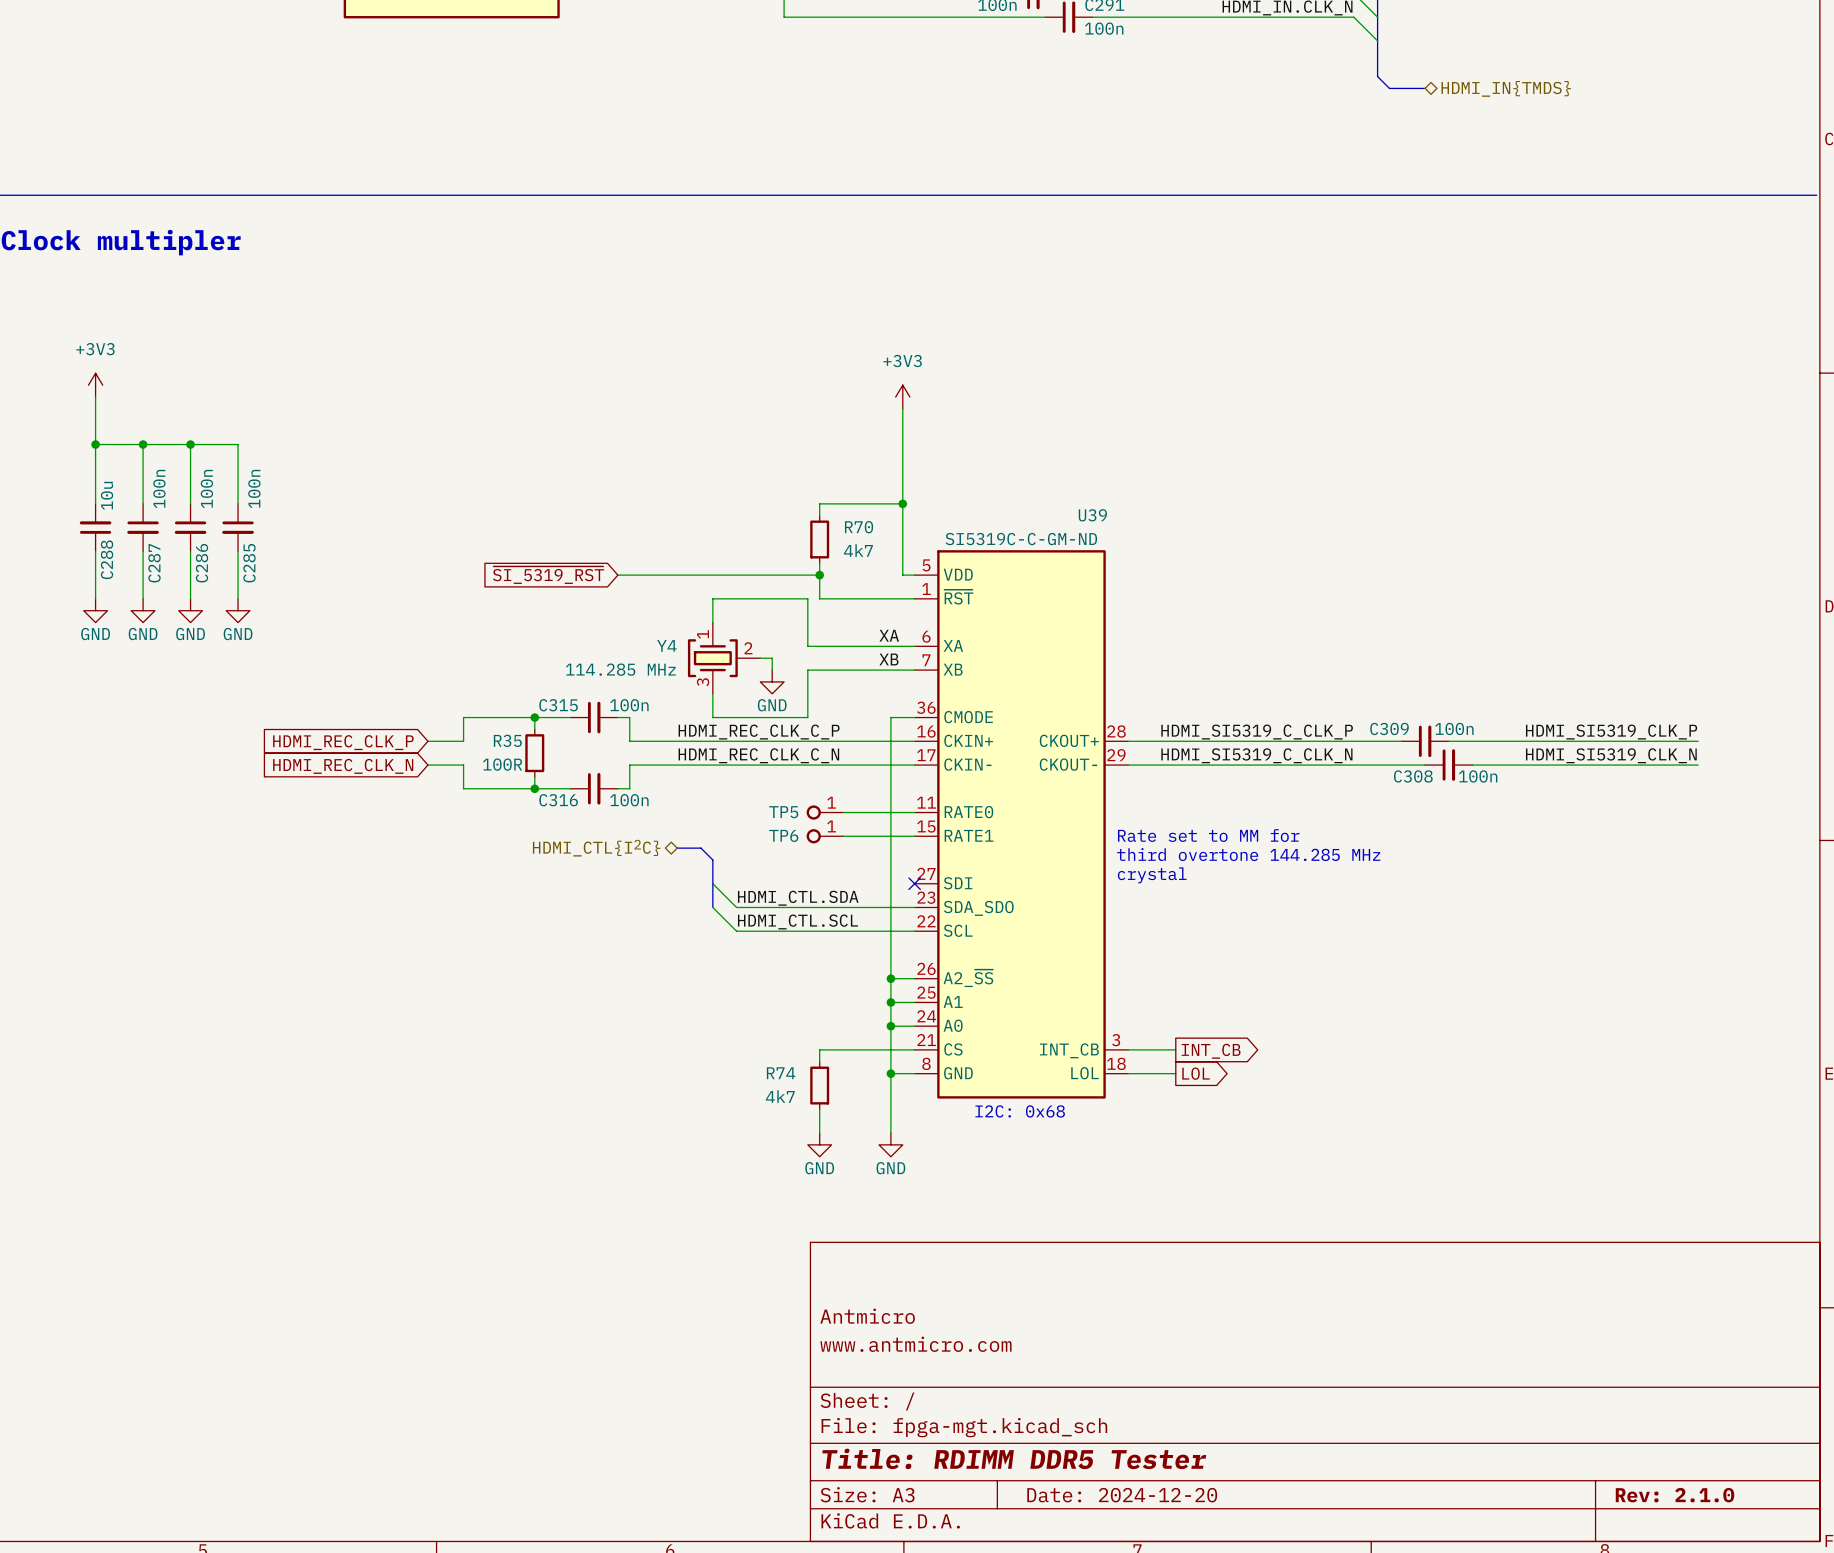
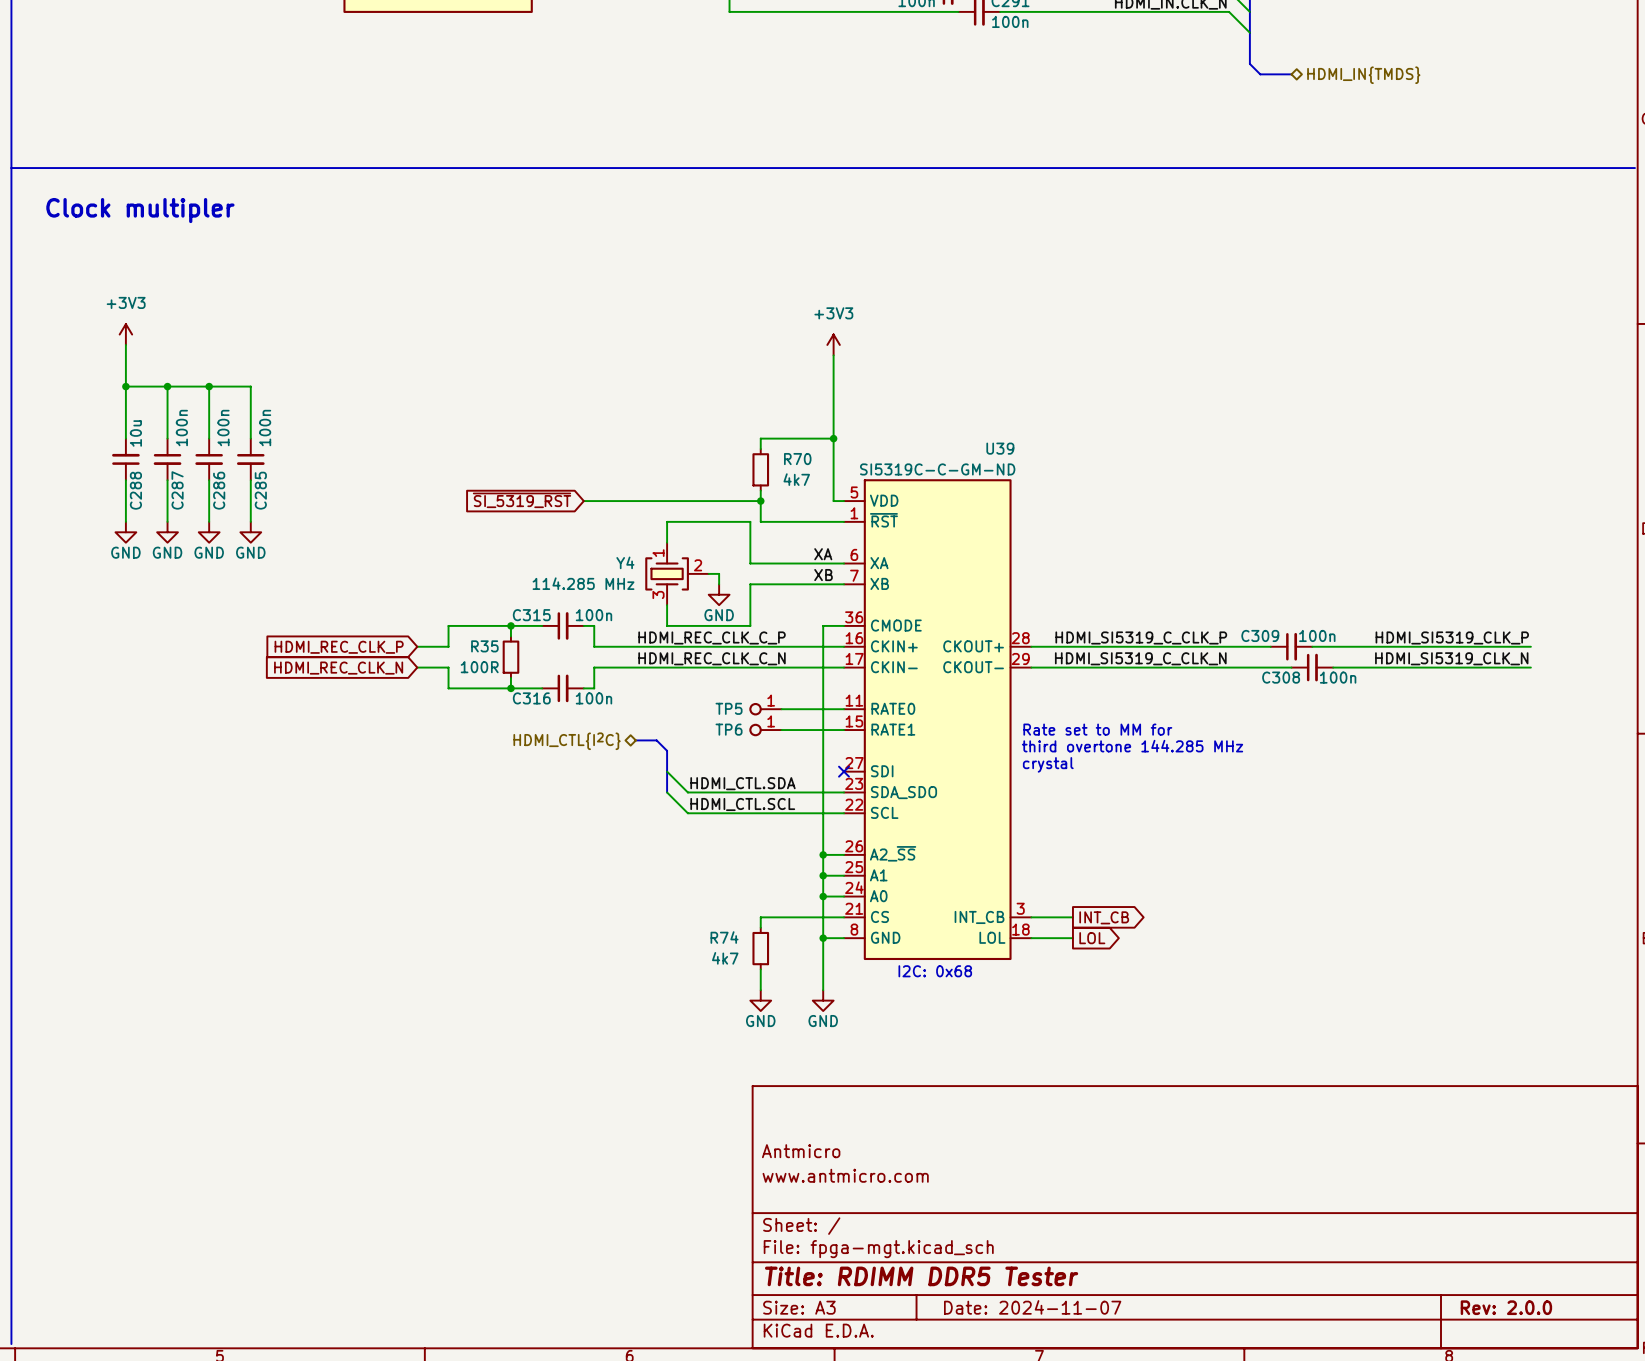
title block: Date: 2024-12-20 (1122, 1495) -> Date: 2024-11-07 (1032, 1307)
title block: Rev: 2.1.0 (1675, 1495) -> Rev: 2.0.0 (1506, 1307)

